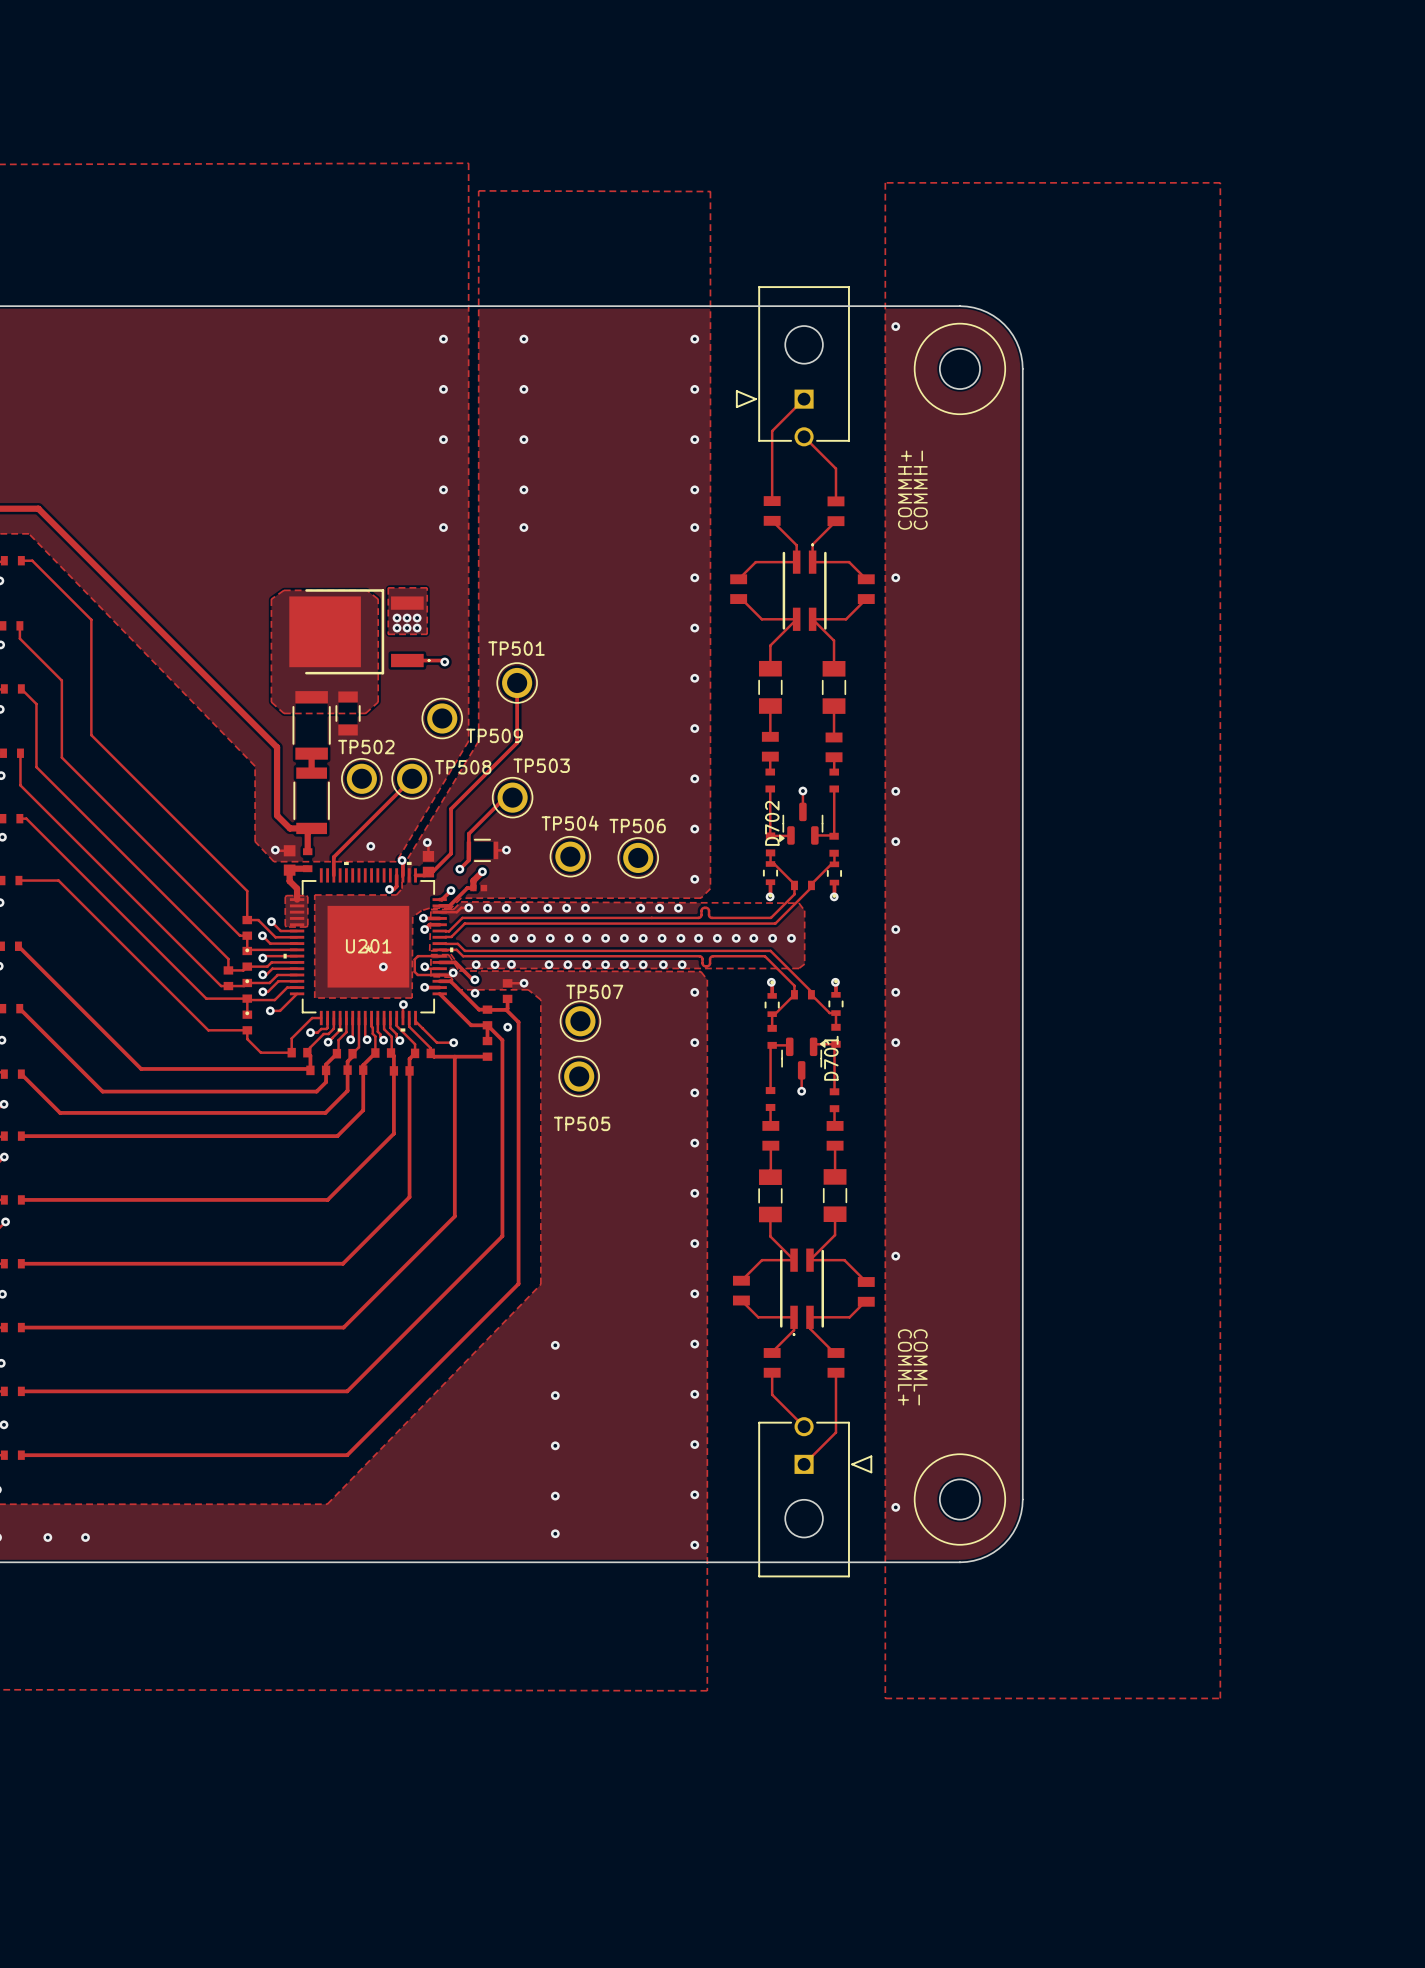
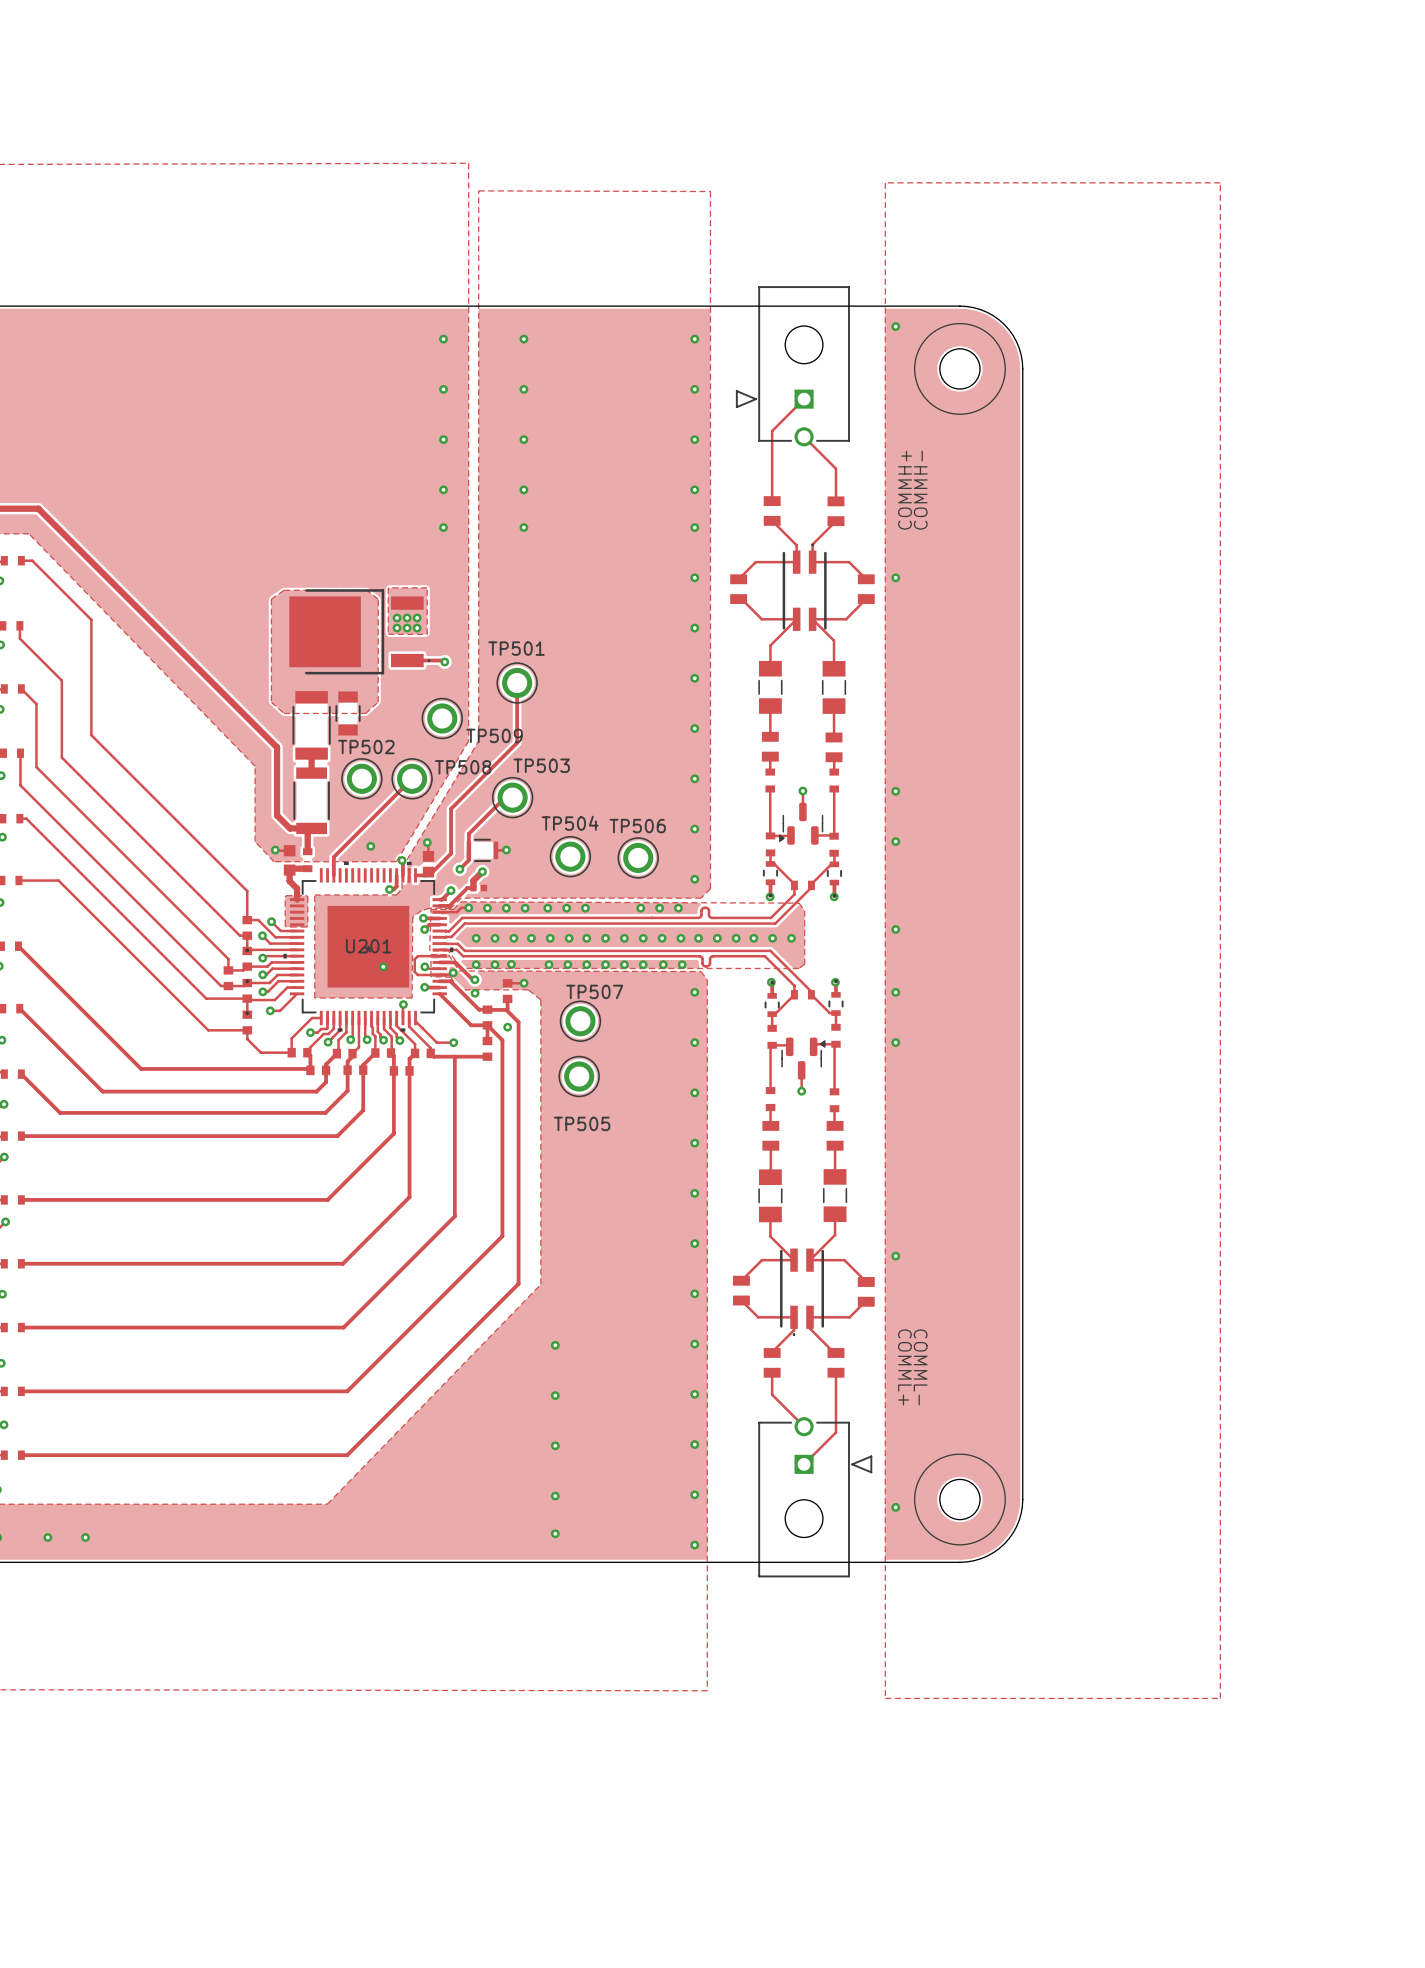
D702 name: D702 (772, 823) -> none
D701 name: D701 (831, 1058) -> none

